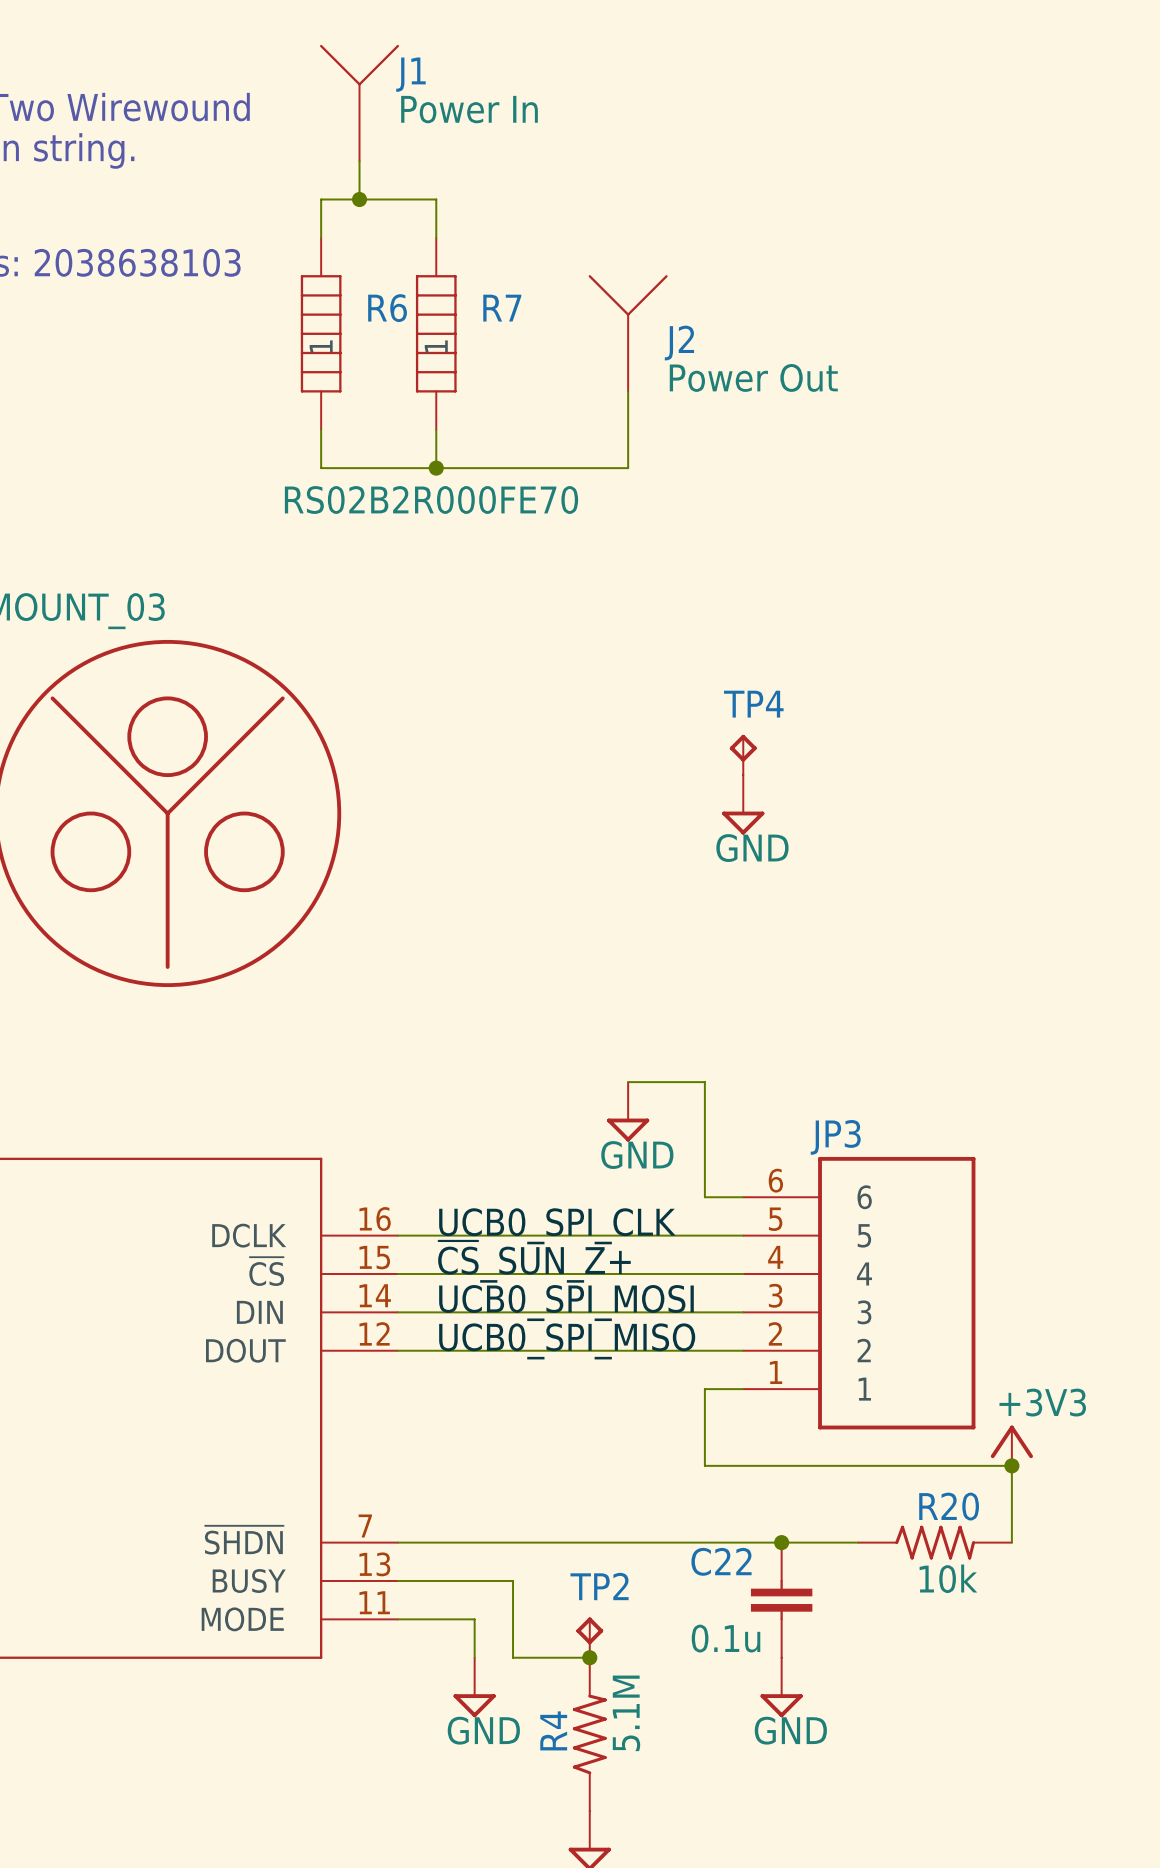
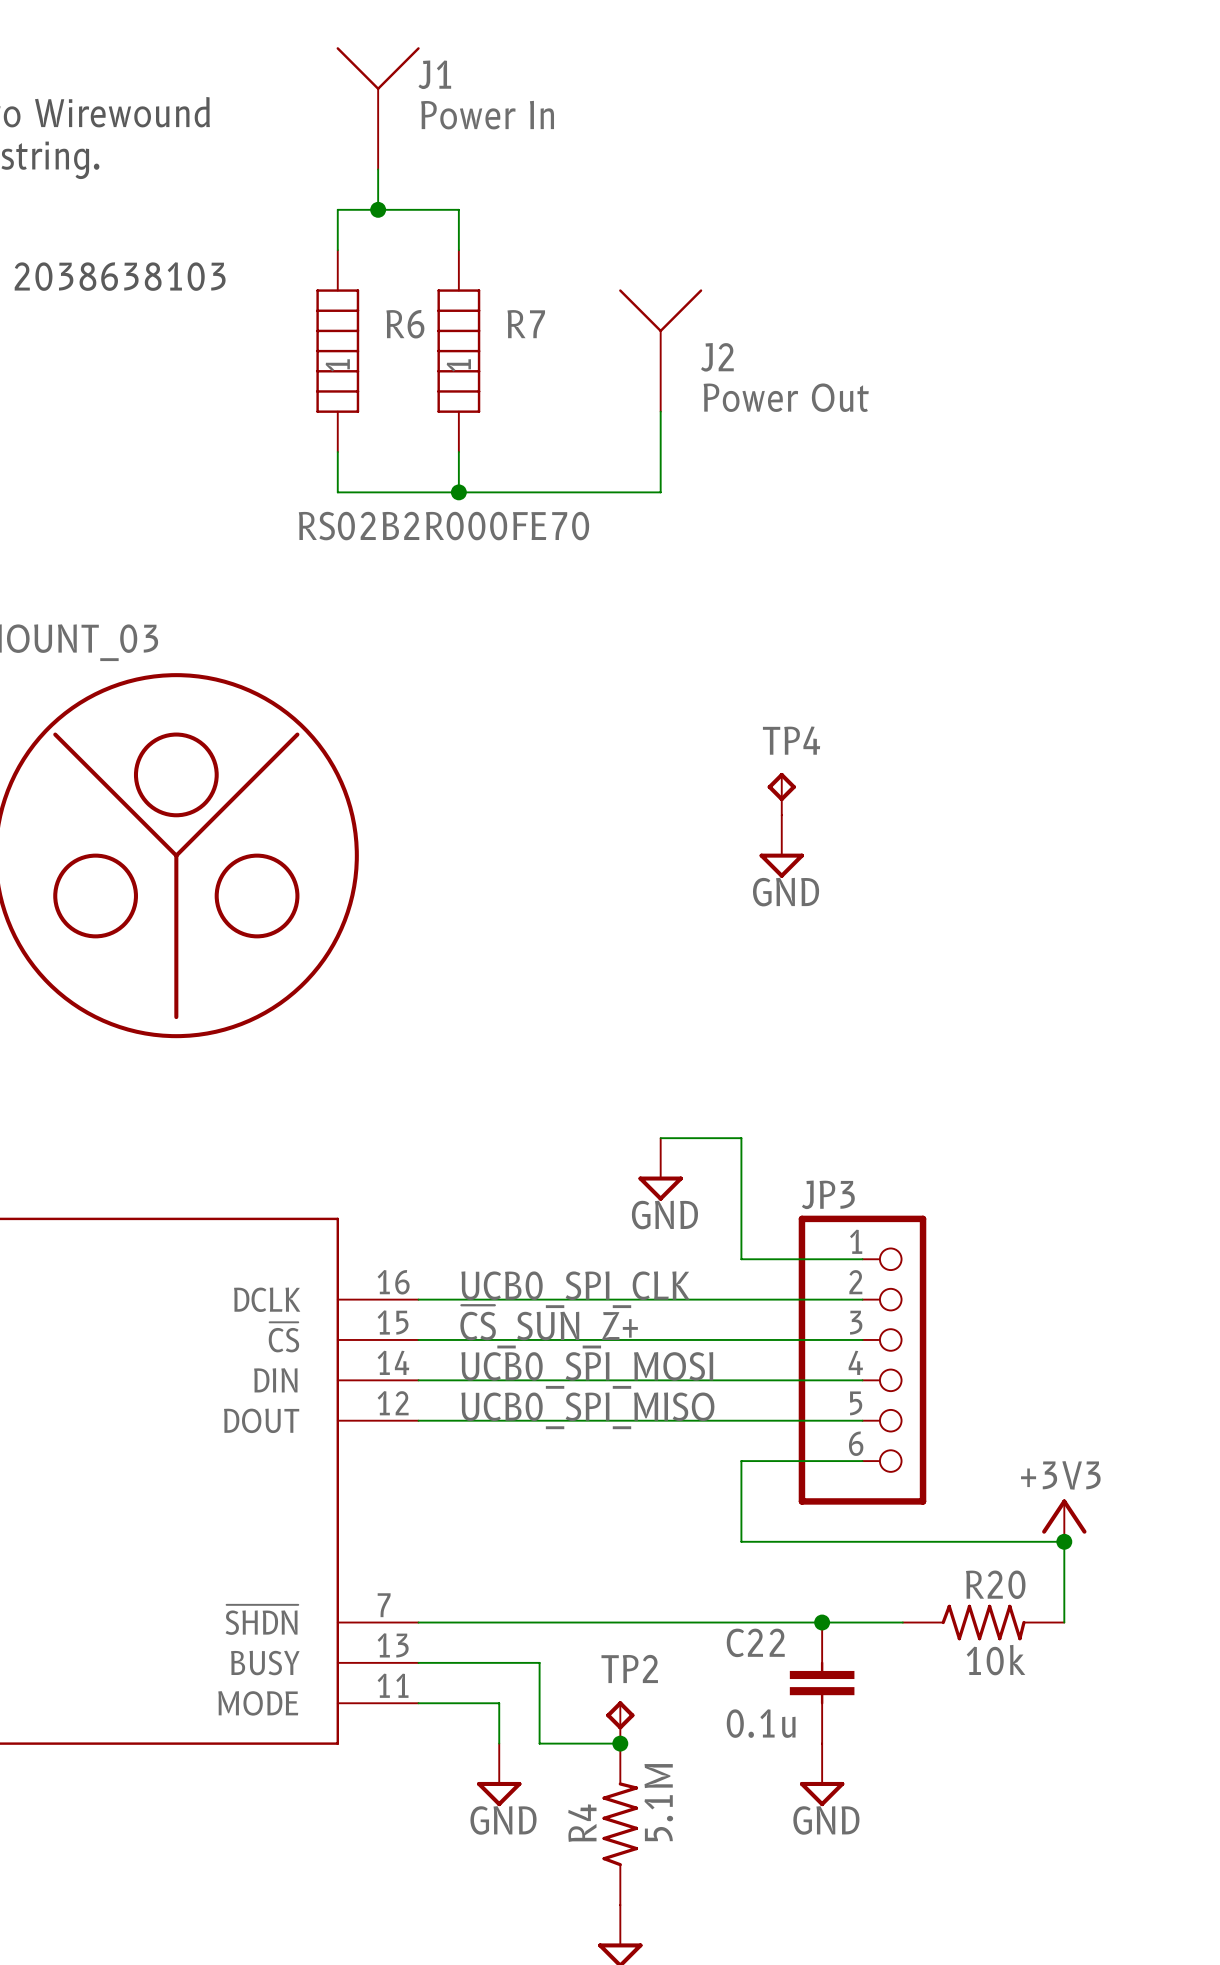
JP3 symbol: [743, 1156, 976, 1430] -> [798, 1215, 927, 1505]
power symbol text position: +3V3 (1042, 1402) -> +3V3 (1060, 1475)

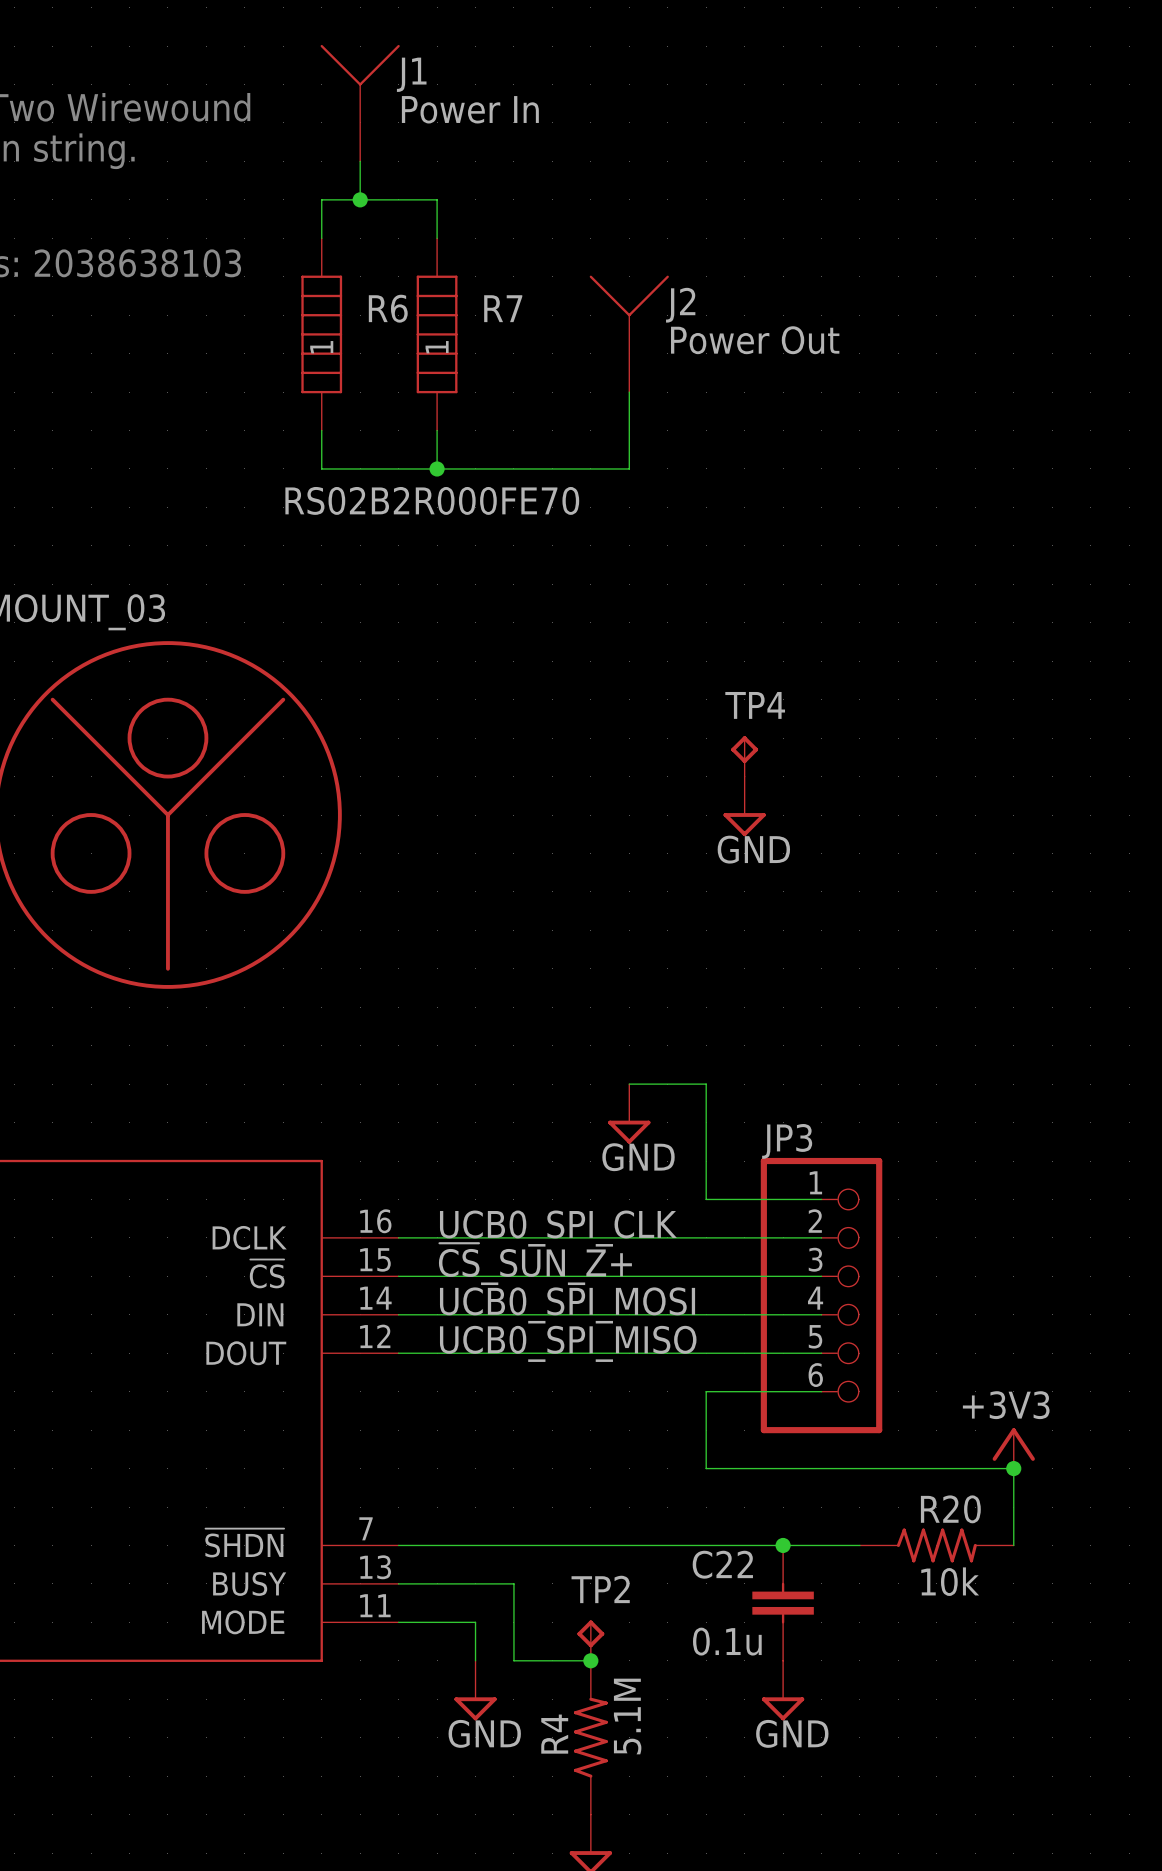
J2 name position: J2 (717, 357) -> J2 (680, 305)
J2 value position: Power Out (786, 397) -> Power Out (755, 340)

